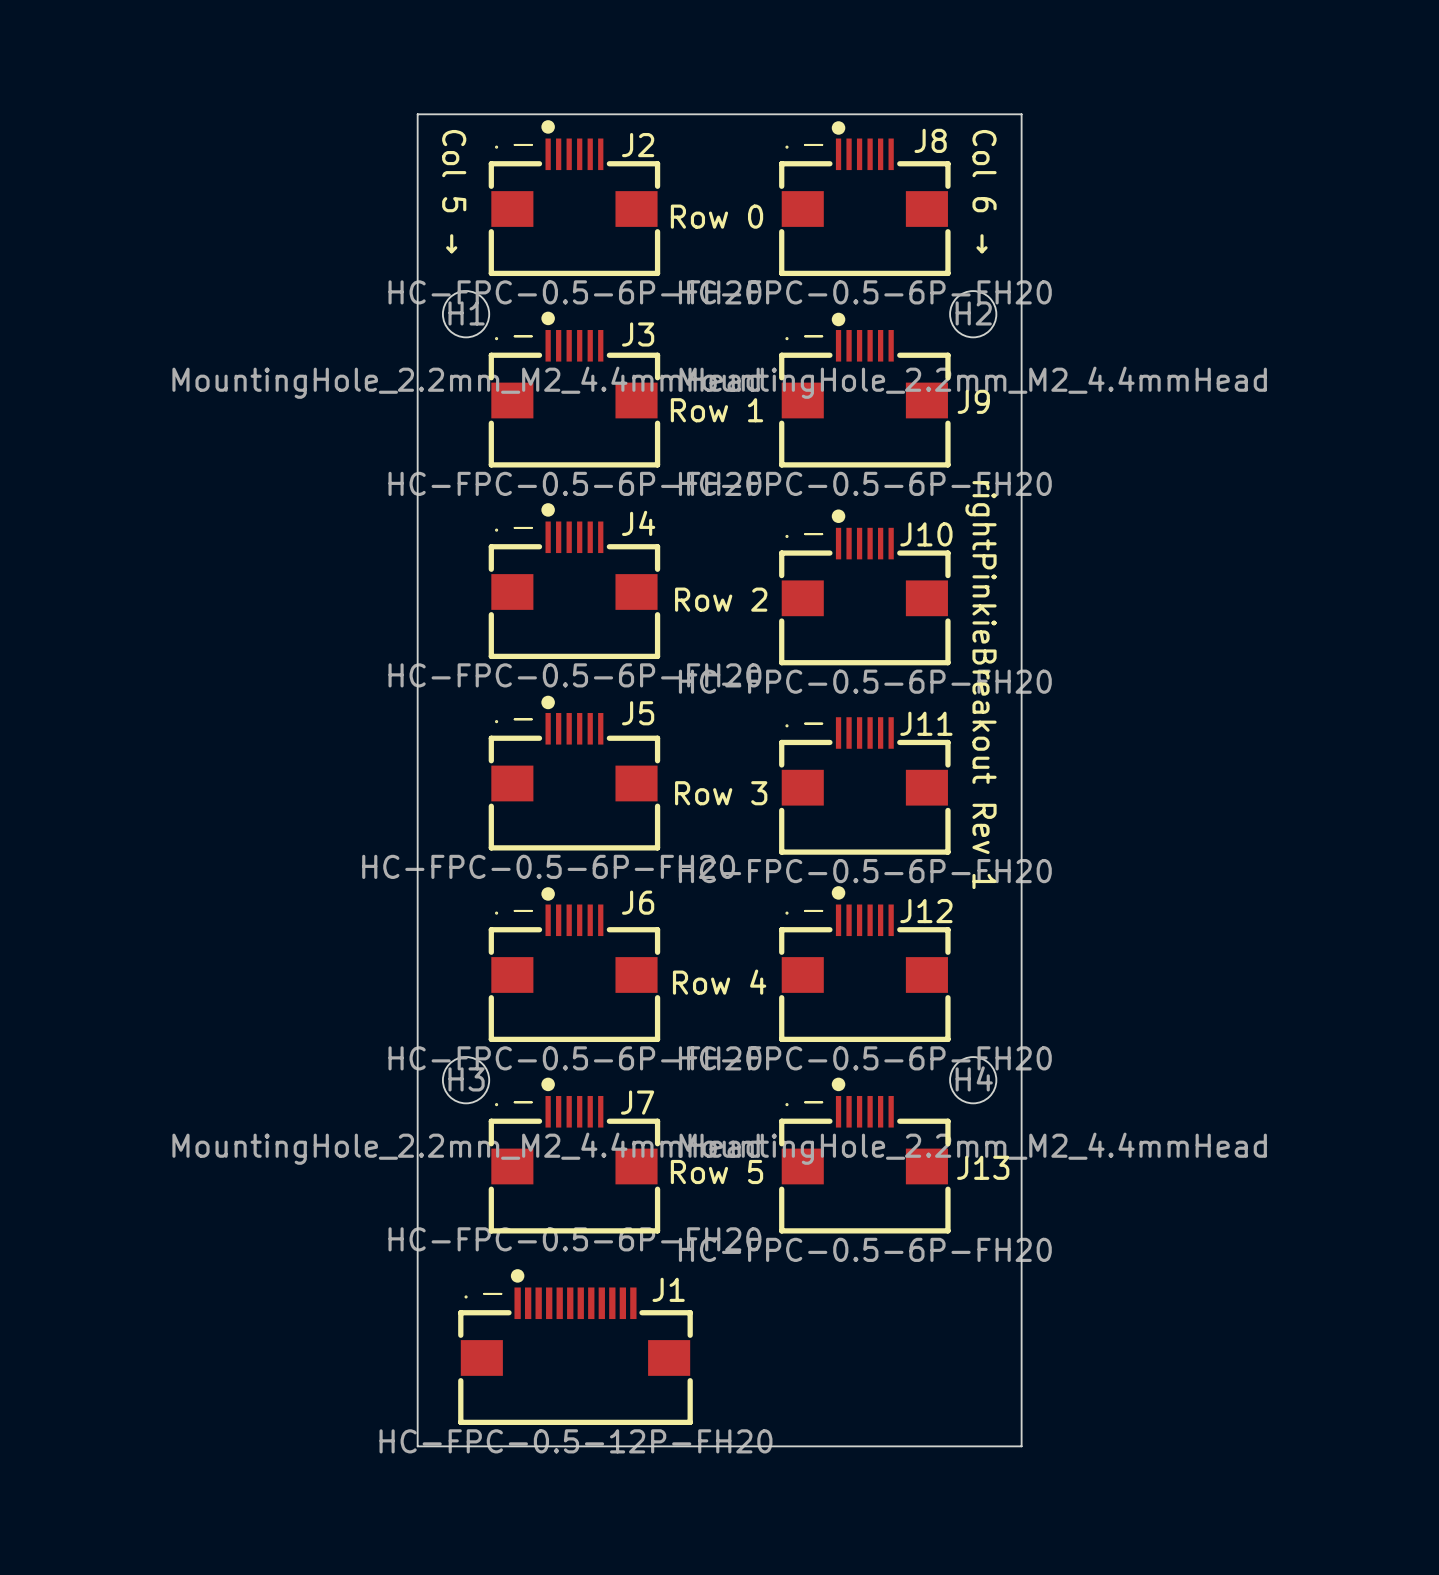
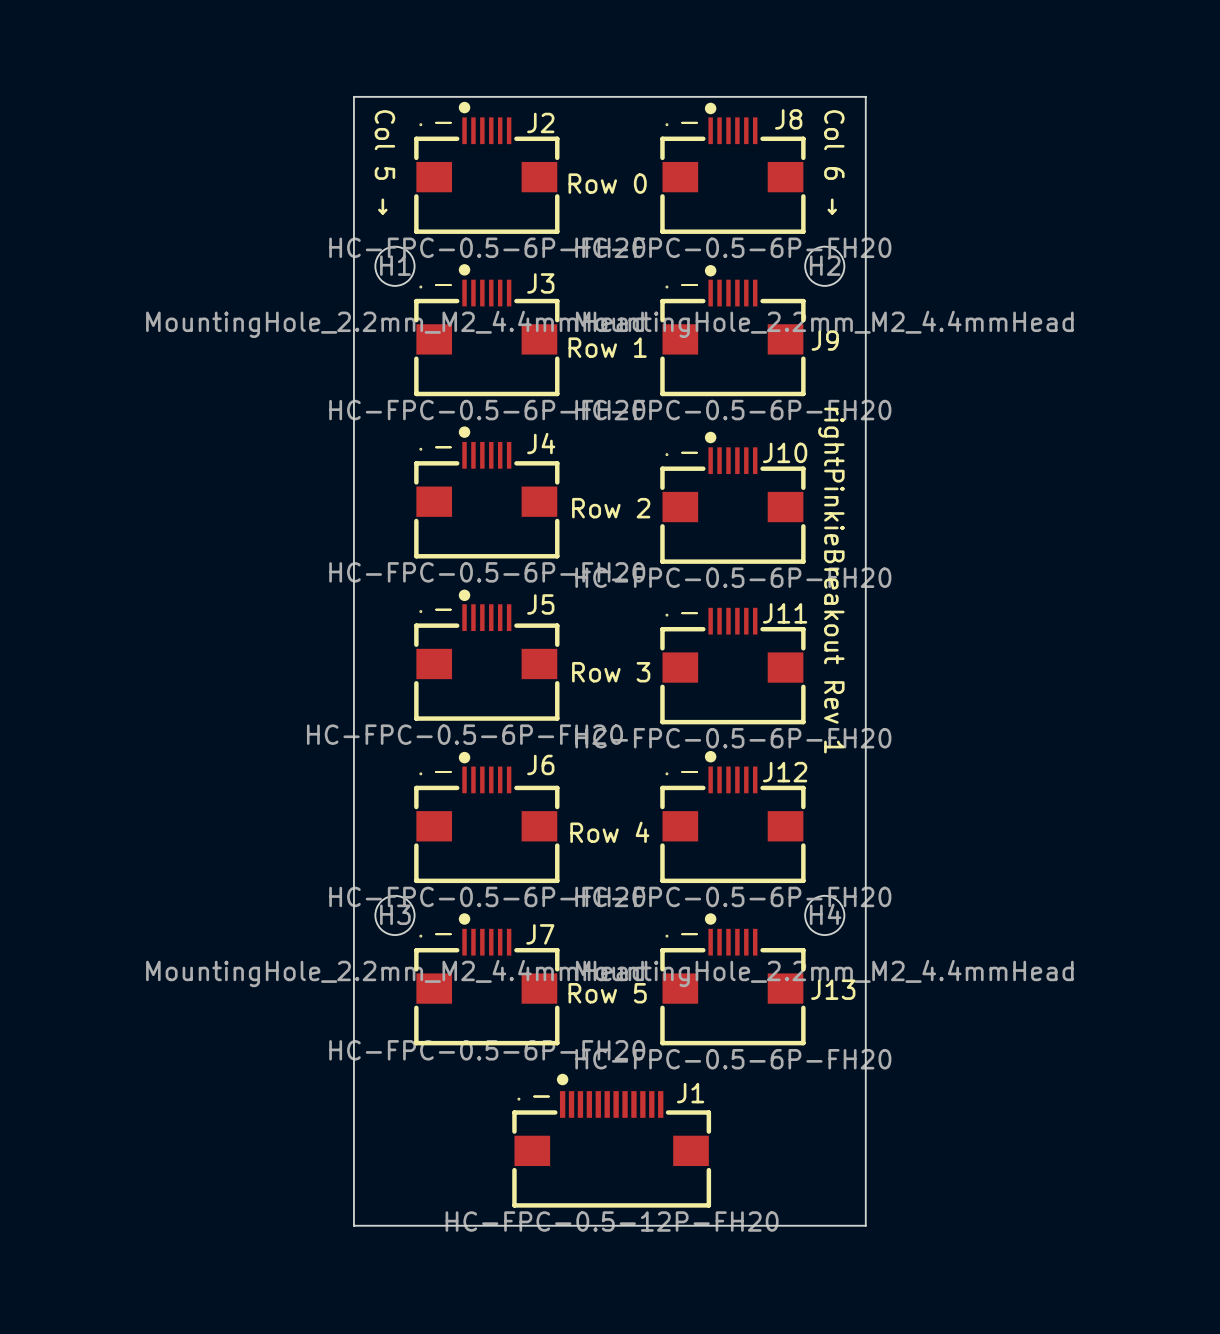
drawing position: (517, 1275) -> (562, 1079)
J1 position: (575, 1356) -> (611, 1149)

